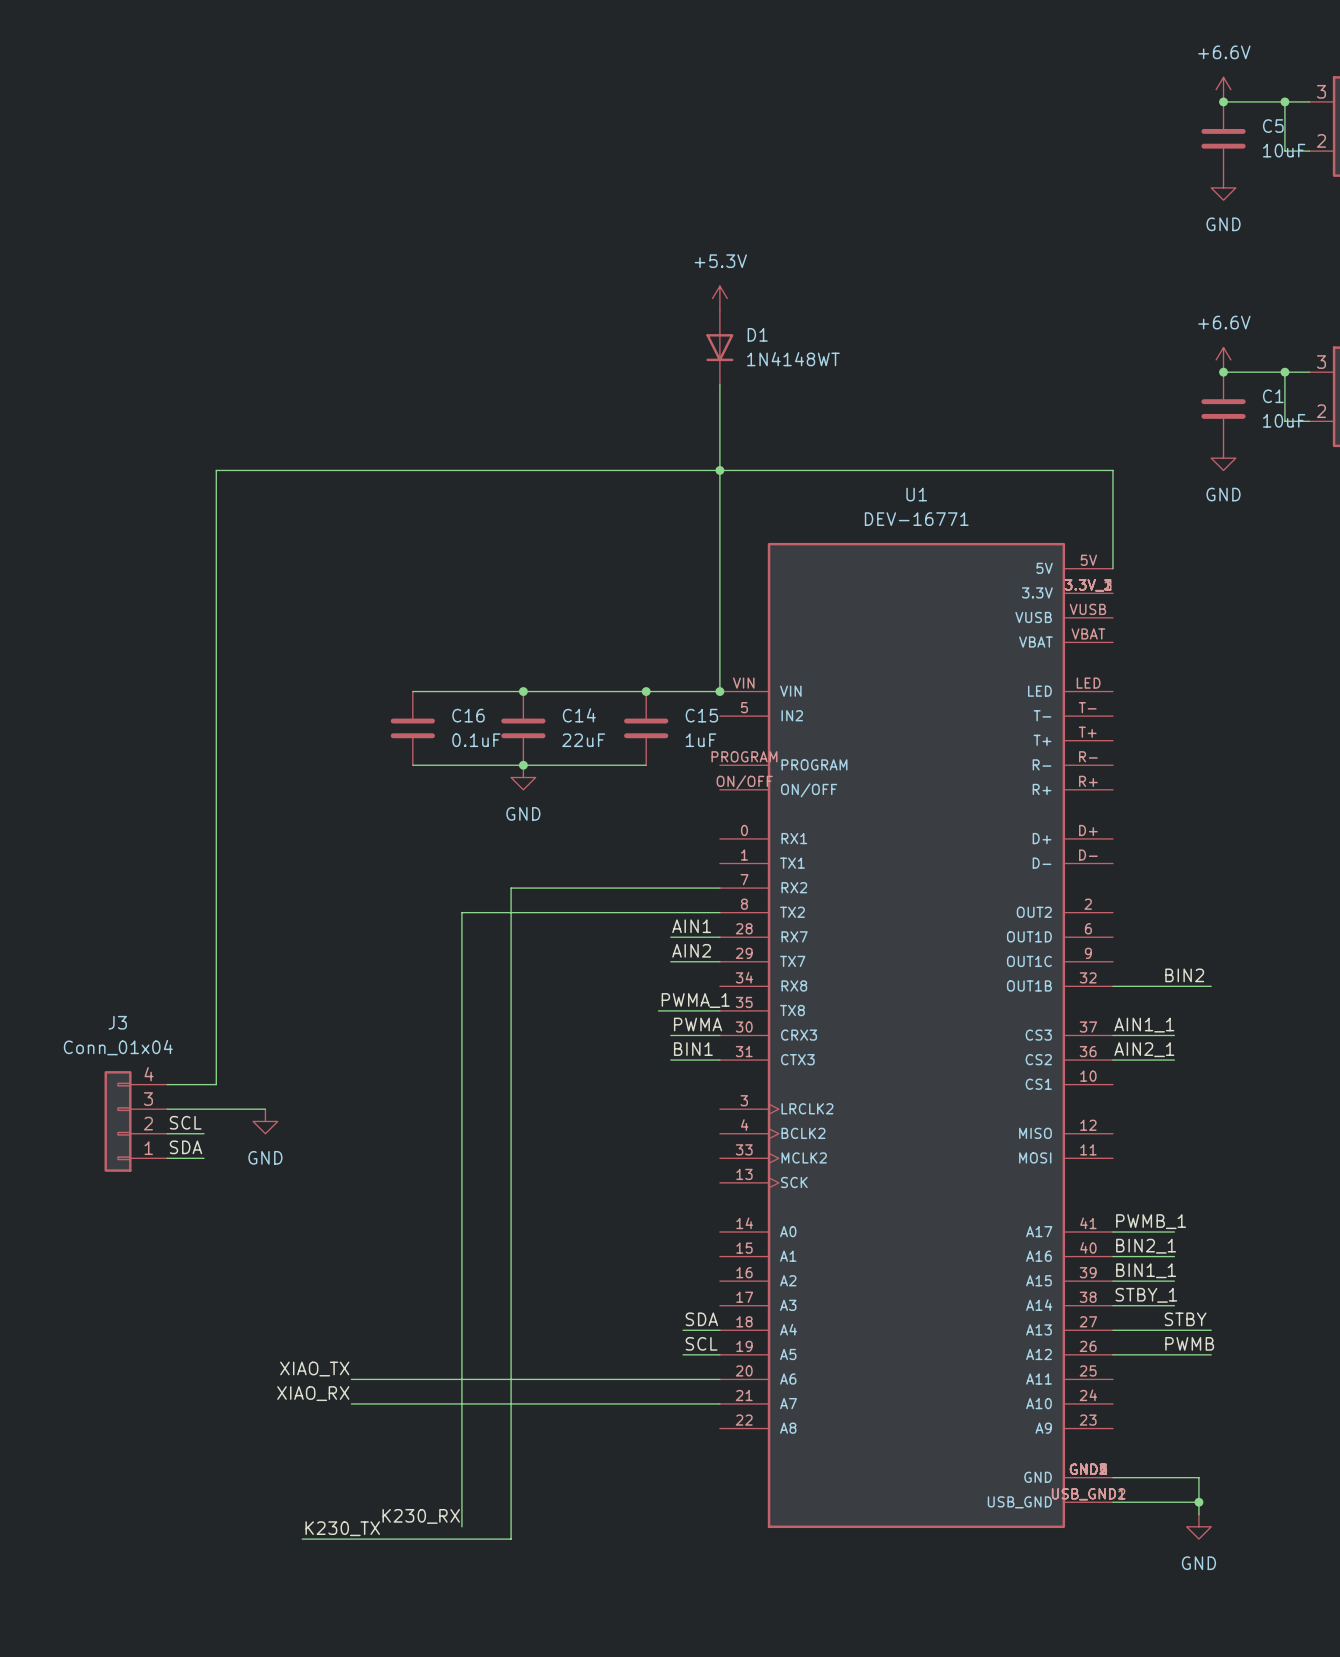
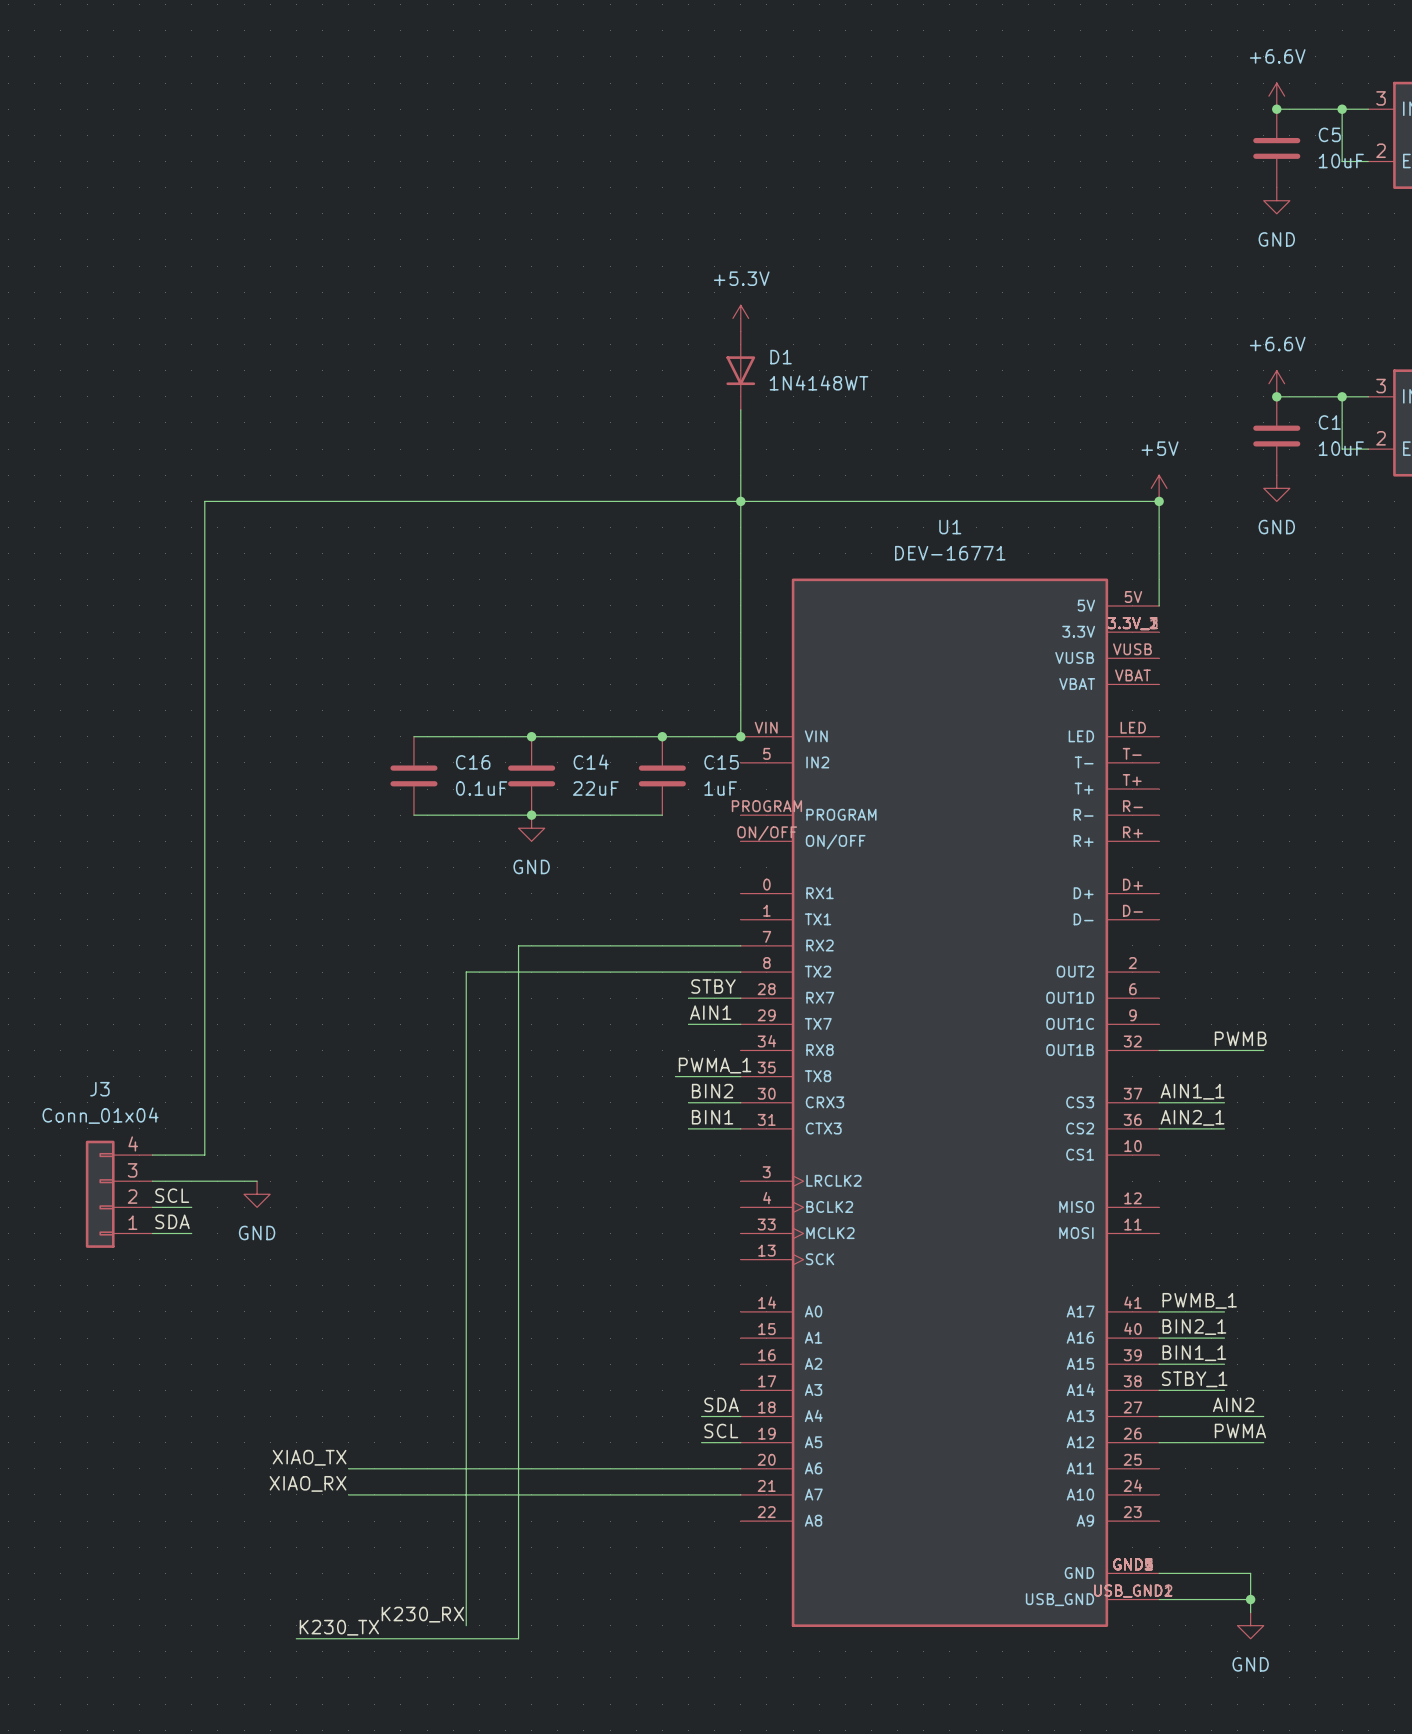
power symbol: none -> +5V (1159, 488)
junction: none -> (1159, 501)
label: AIN1 (691, 926) -> STBY (713, 986)
label: AIN2 (691, 950) -> AIN1 (710, 1012)
label: BIN2 (1184, 975) -> PWMB (1240, 1038)
label: PWMA (698, 1024) -> BIN2 (712, 1091)
label: STBY (1185, 1319) -> AIN2 (1233, 1404)
label: PWMB (1189, 1343) -> PWMA (1240, 1430)

